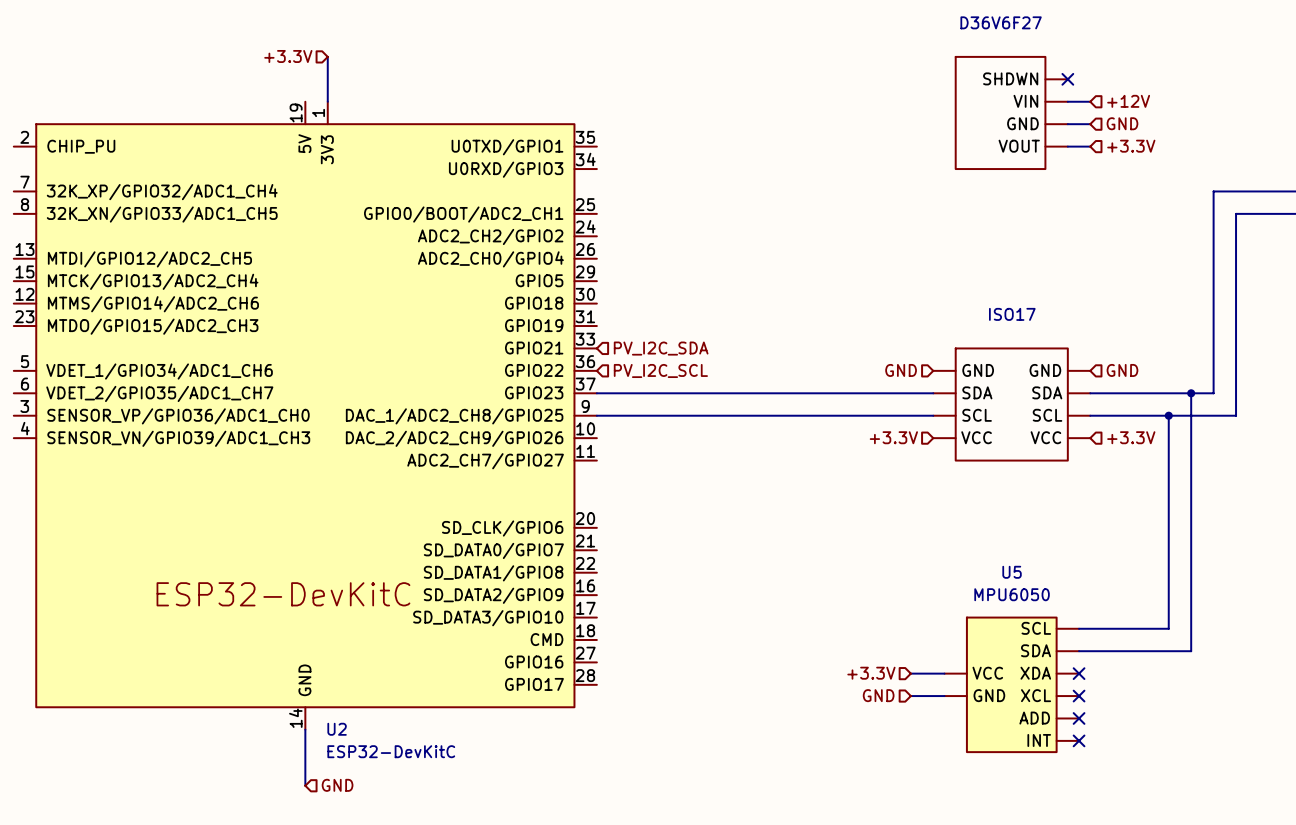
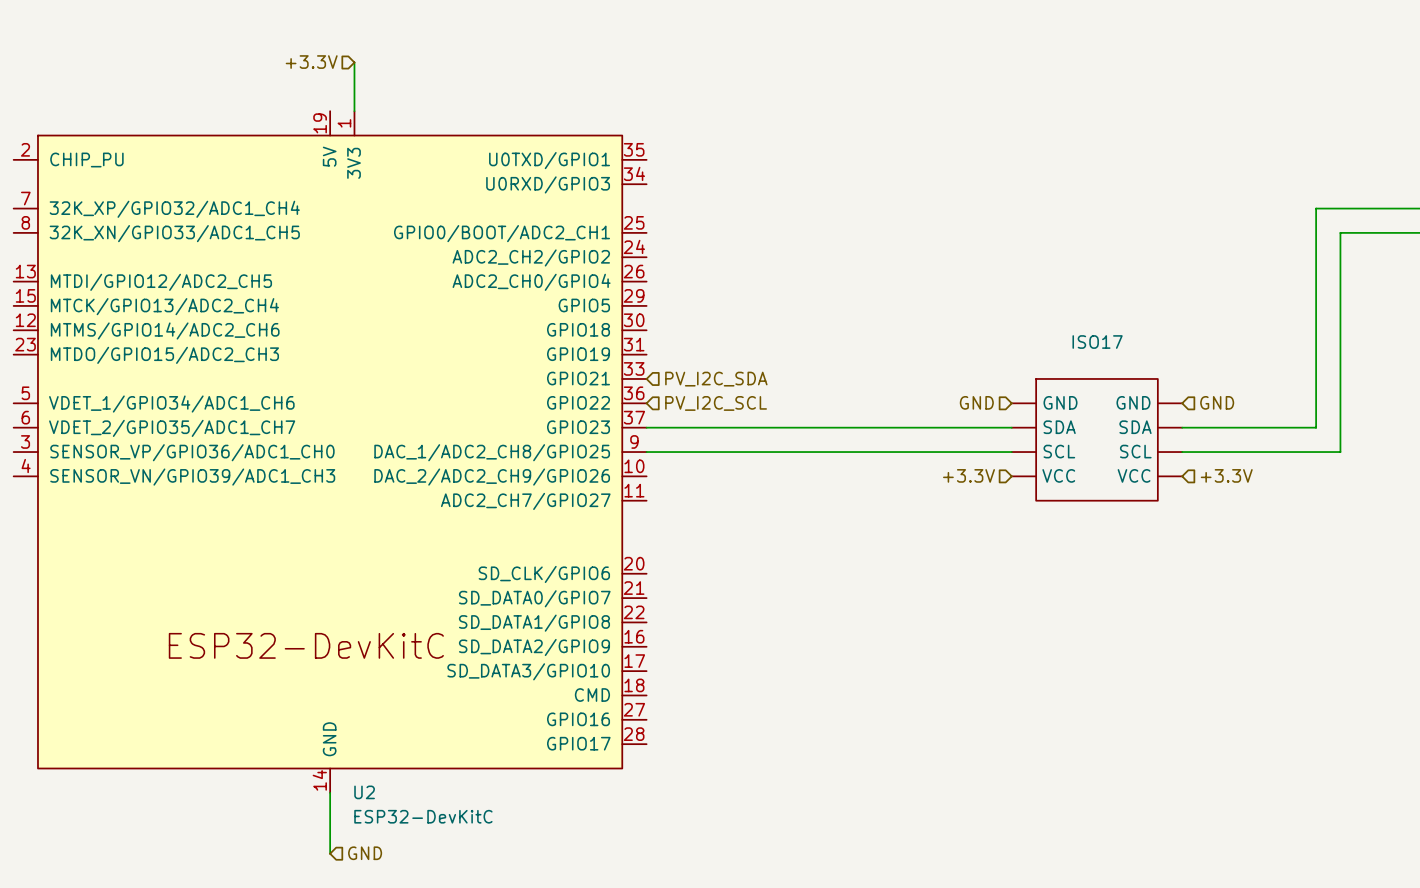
no-connect mark: (1067, 79) -> none
wire: (1067, 101) (1090, 101) -> none
hierarchical label: +12V (1128, 101) -> none
D36V6F27: (1011, 112) -> none
hierarchical label: GND (1122, 123) -> none
wire: (1067, 124) (1090, 124) -> none
wire: (1067, 146) (1090, 146) -> none
hierarchical label: +3.3V (1131, 146) -> none
wire: (1191, 393) (1191, 651) (1079, 651) -> none
junction: (1191, 393) -> none
wire: (1168, 415) (1168, 628) (1079, 628) -> none
junction: (1168, 415) -> none
hierarchical label: +3.3V (871, 673) -> none
wire: (910, 673) (944, 673) -> none
no-connect mark: (1079, 673) -> none
U5: MPU6050 (1011, 684) -> none
hierarchical label: GND (878, 695) -> none
wire: (910, 696) (944, 696) -> none
no-connect mark: (1079, 696) -> none
no-connect mark: (1079, 718) -> none
no-connect mark: (1079, 740) -> none

